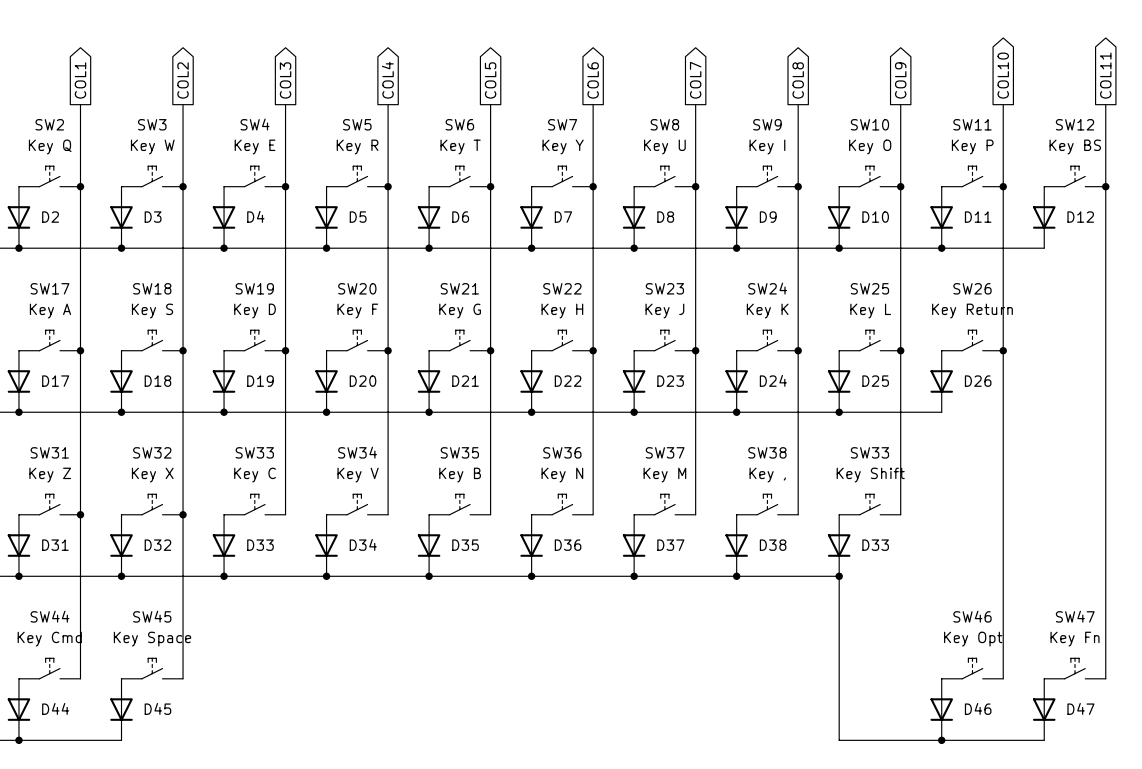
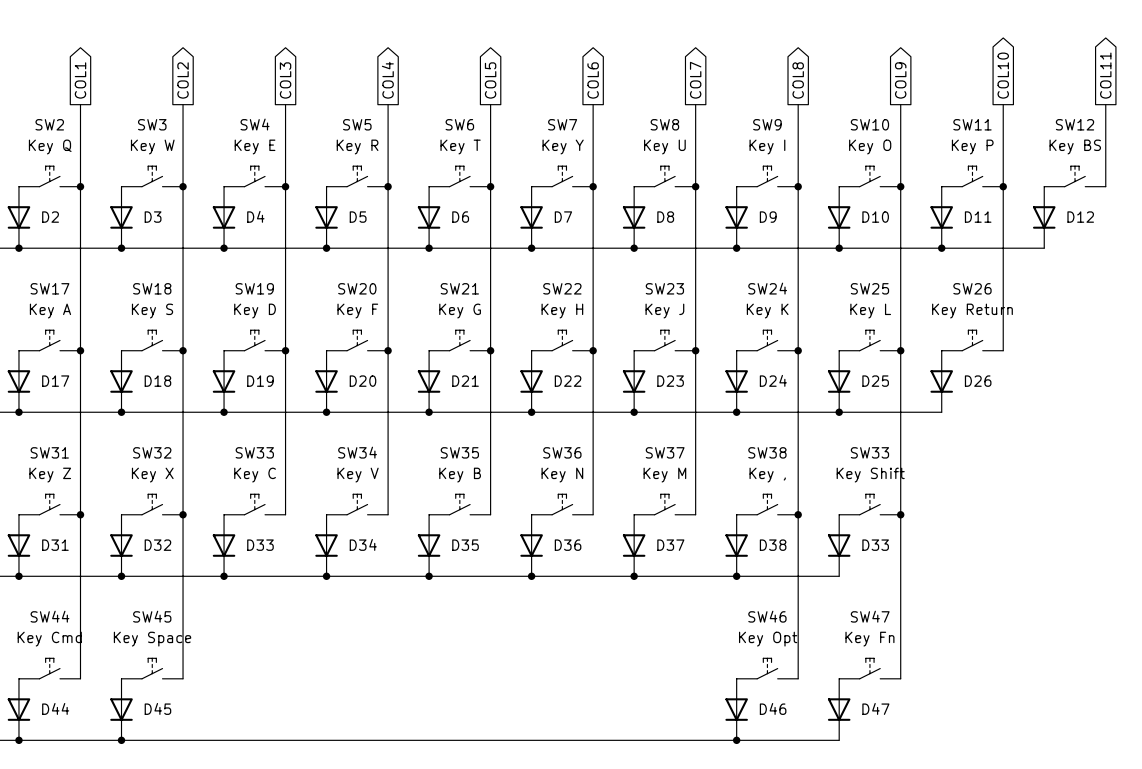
wire: (1105, 186) (1105, 678) -> none
junction: (1105, 186) -> none
wire: (1003, 350) (1003, 678) -> none
junction: (1003, 350) -> none
wire: none -> (798, 514) (798, 678)
junction: none -> (798, 514)
wire: none -> (900, 514) (900, 678)
junction: none -> (900, 514)
wire: (839, 576) (839, 740) (1044, 740) -> none
junction: (839, 576) -> none
SW46 position: (972, 668) -> (767, 668)
SW47 position: (1075, 668) -> (869, 668)
D46 position: (941, 709) -> (736, 709)
D47 position: (1044, 709) -> (839, 709)
wire: none -> (121, 740) (839, 740)
junction: none -> (121, 740)
junction: none -> (736, 740)
junction: (941, 740) -> none

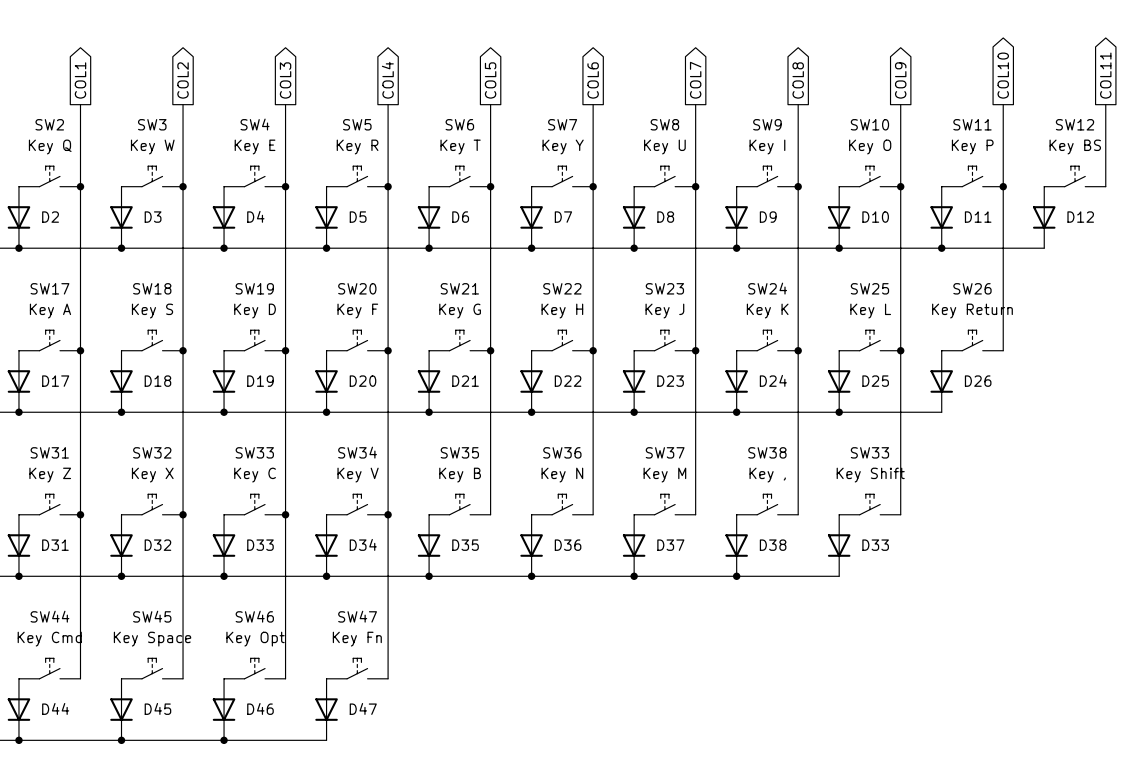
wire: none -> (285, 514) (285, 678)
junction: none -> (285, 514)
wire: none -> (388, 514) (388, 678)
junction: none -> (388, 514)
wire: (798, 514) (798, 678) -> none
junction: (798, 514) -> none
wire: (900, 514) (900, 678) -> none
junction: (900, 514) -> none
SW46 position: (767, 668) -> (254, 668)
SW47 position: (869, 668) -> (357, 668)
D46 position: (736, 709) -> (224, 709)
D47 position: (839, 709) -> (326, 709)
junction: none -> (224, 740)
wire: (326, 740) (839, 740) -> none
junction: (736, 740) -> none

